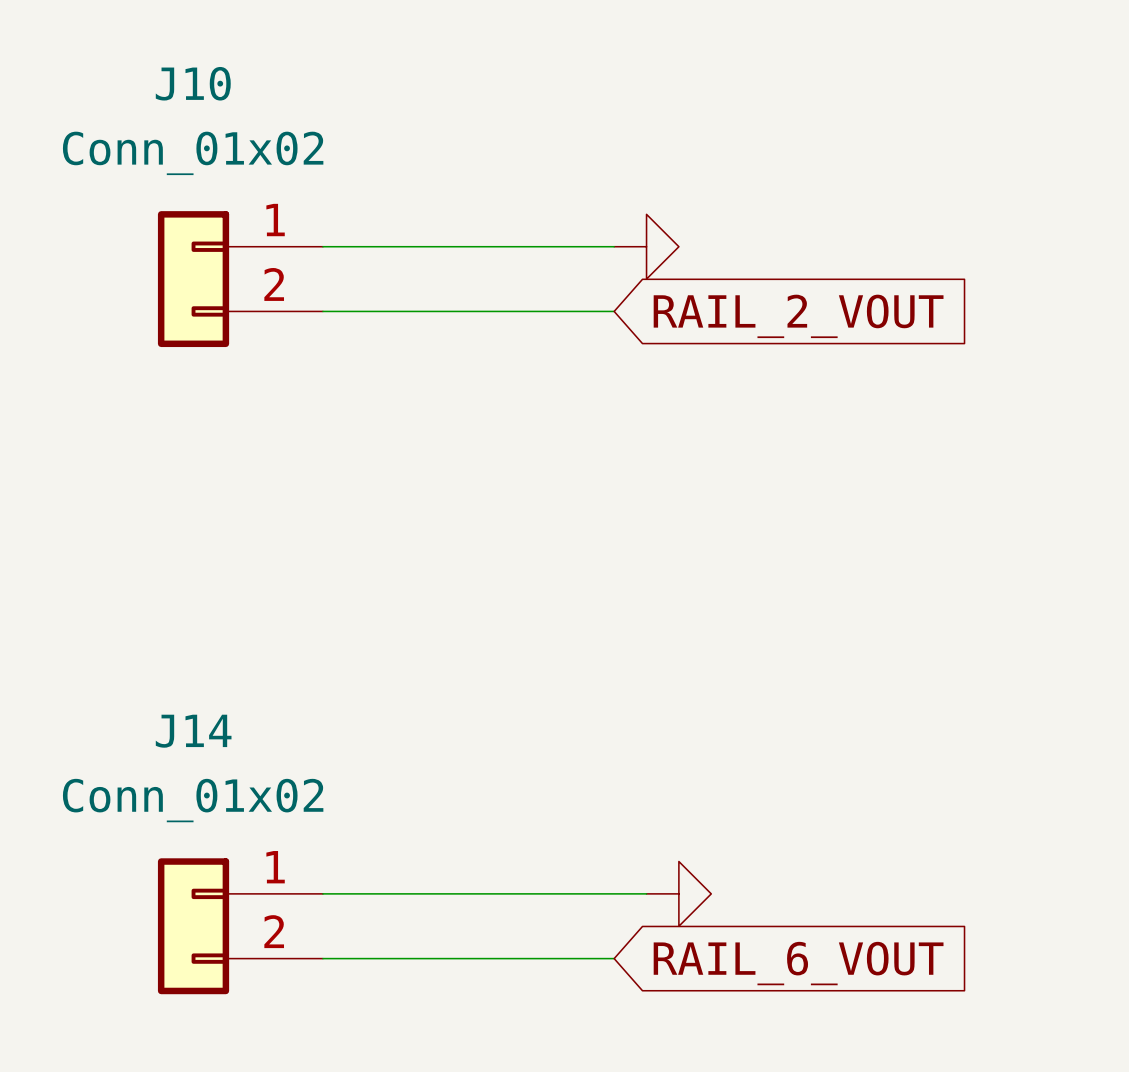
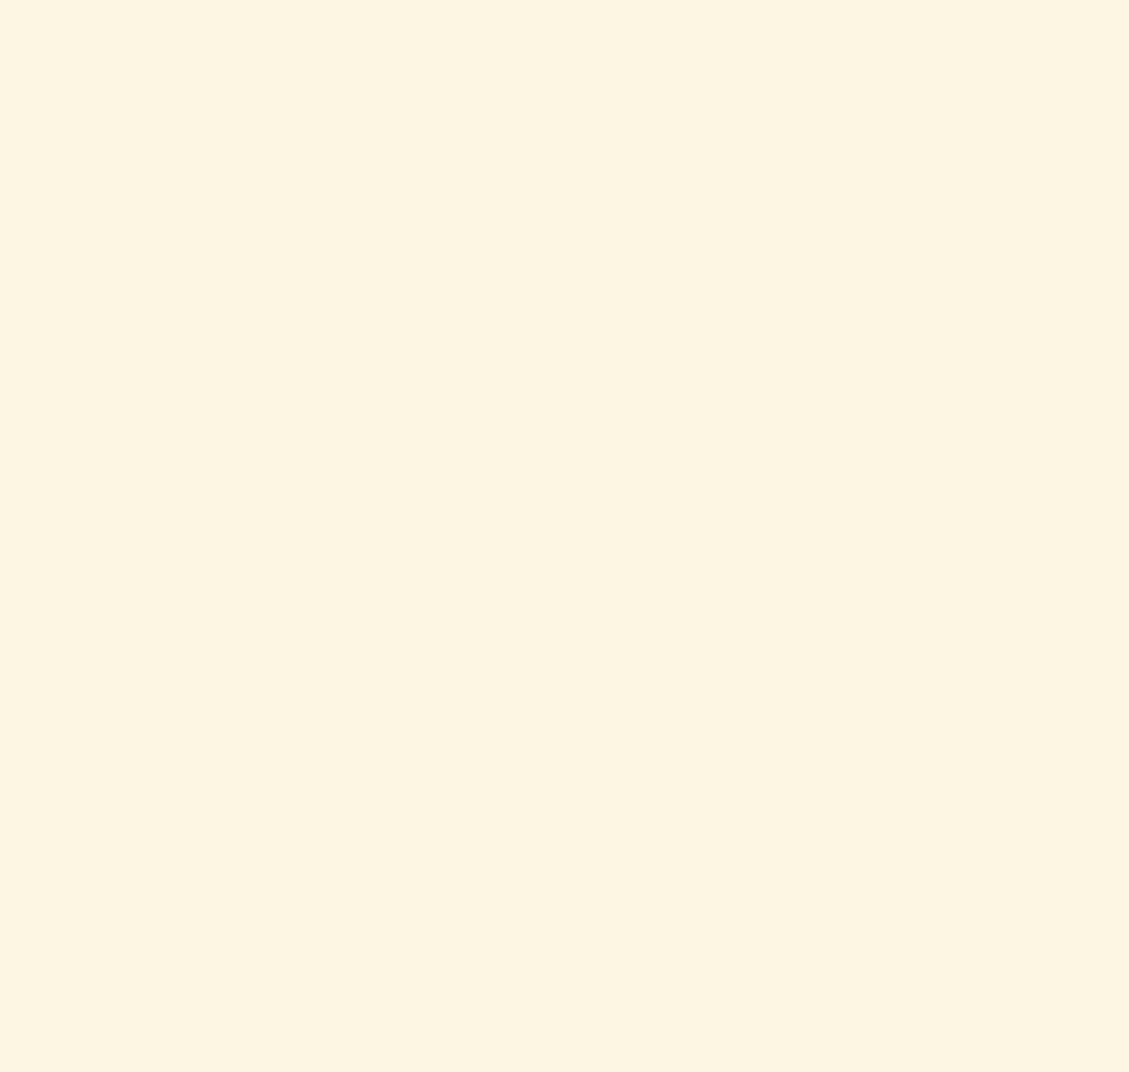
wire: (322, 246) (614, 246) -> none
power symbol: (646, 246) -> none
J10: Conn_01x02 (240, 279) -> none
wire: (322, 311) (614, 311) -> none
global label: RAIL_2_VOUT (798, 316) -> none
wire: (322, 893) (646, 893) -> none
power symbol: (678, 893) -> none
J14: Conn_01x02 (240, 926) -> none
wire: (322, 958) (614, 958) -> none
global label: RAIL_6_VOUT (798, 963) -> none

